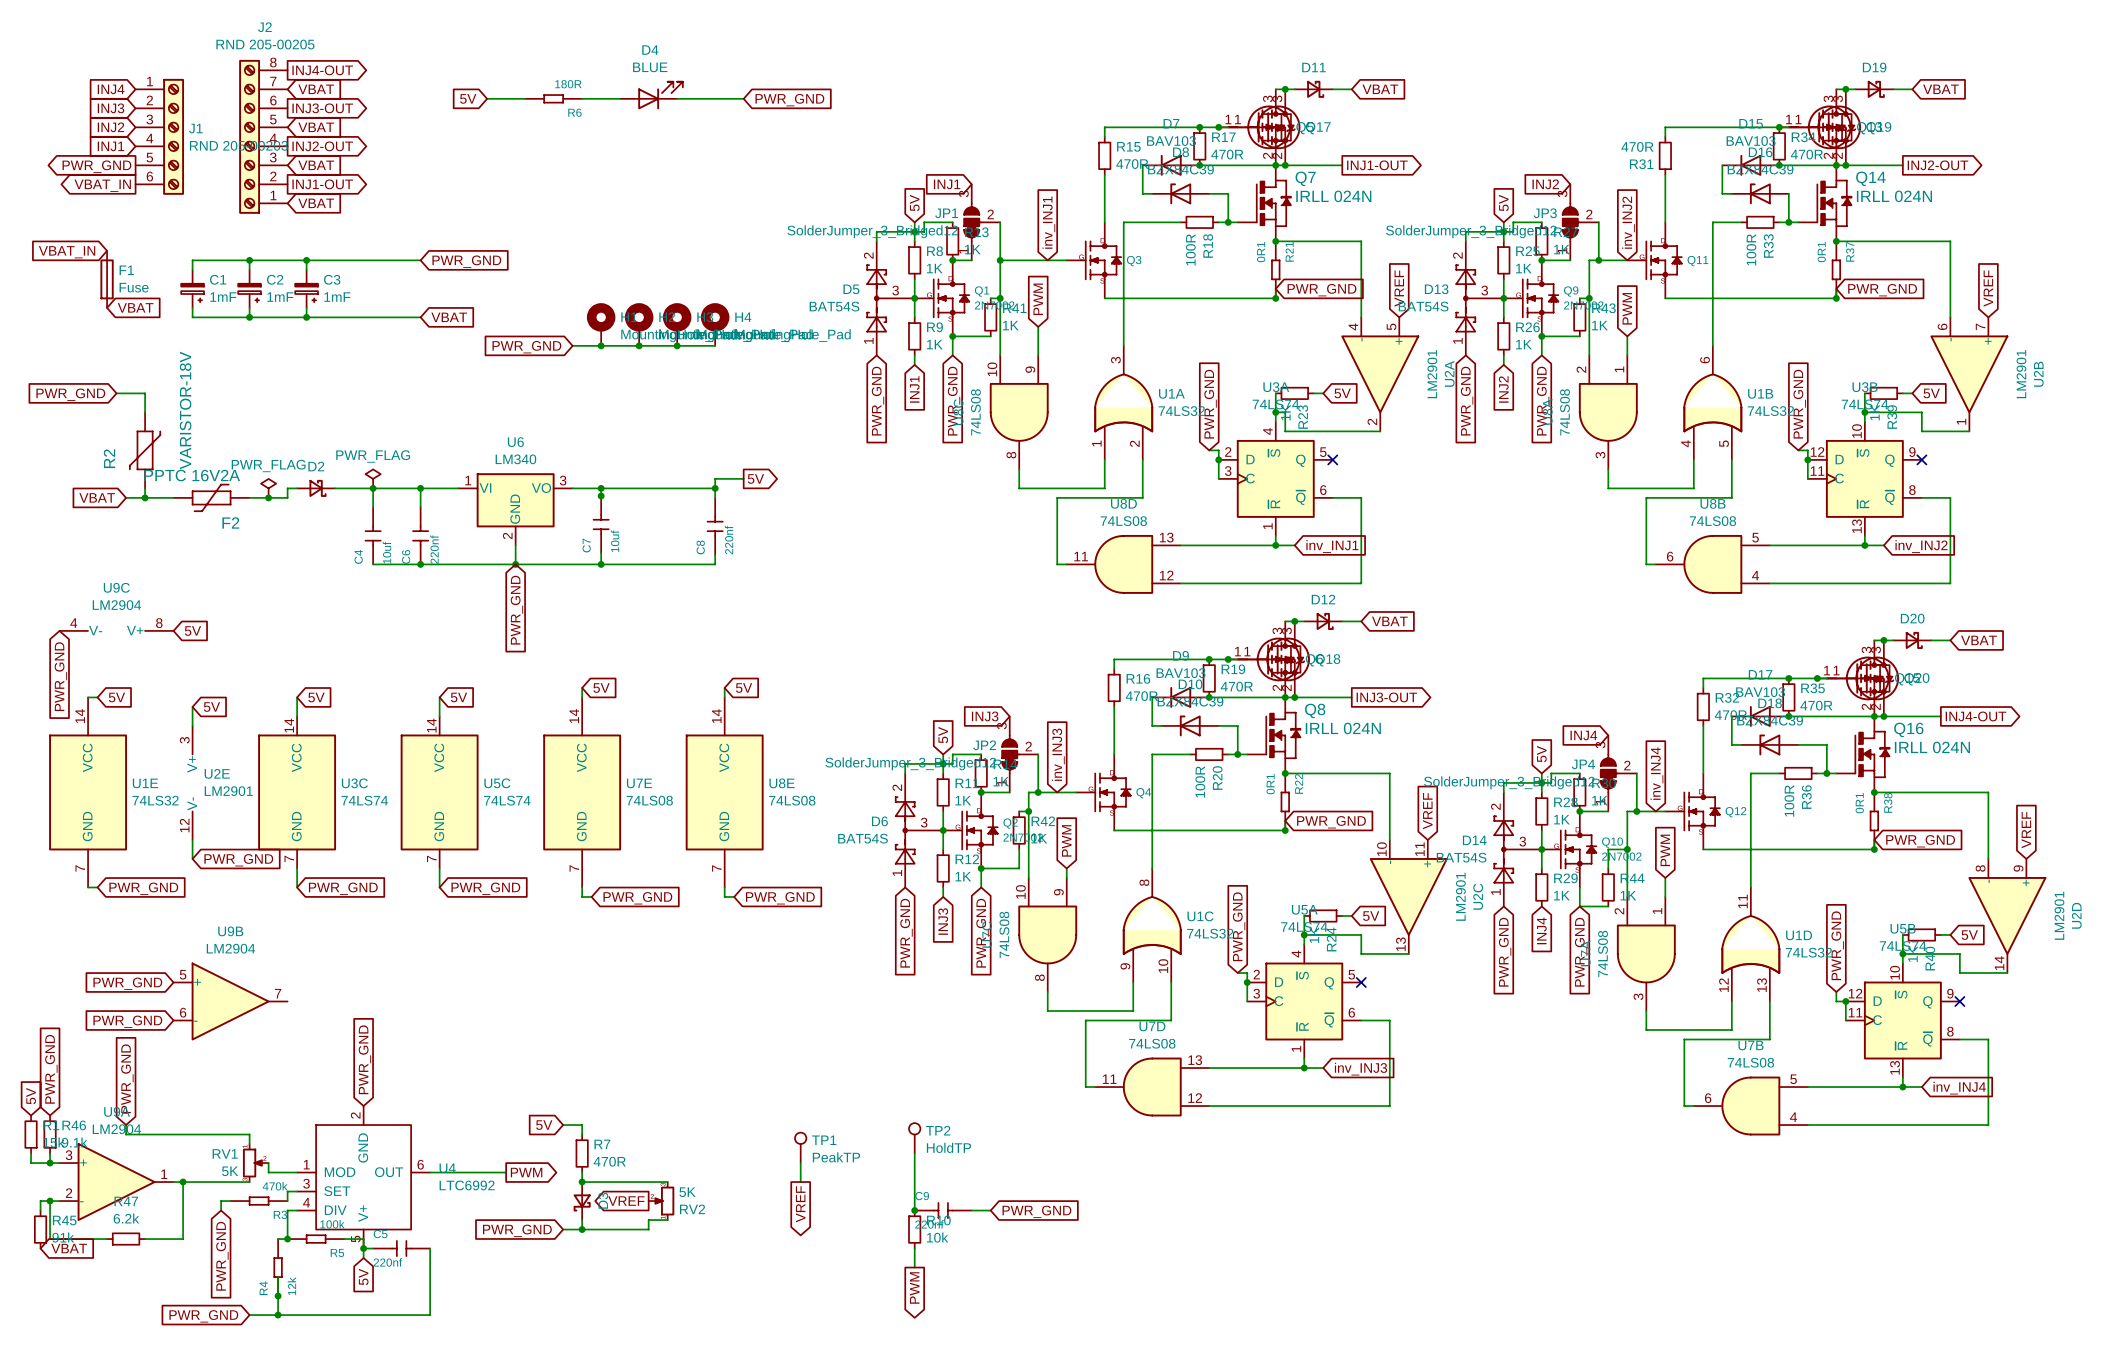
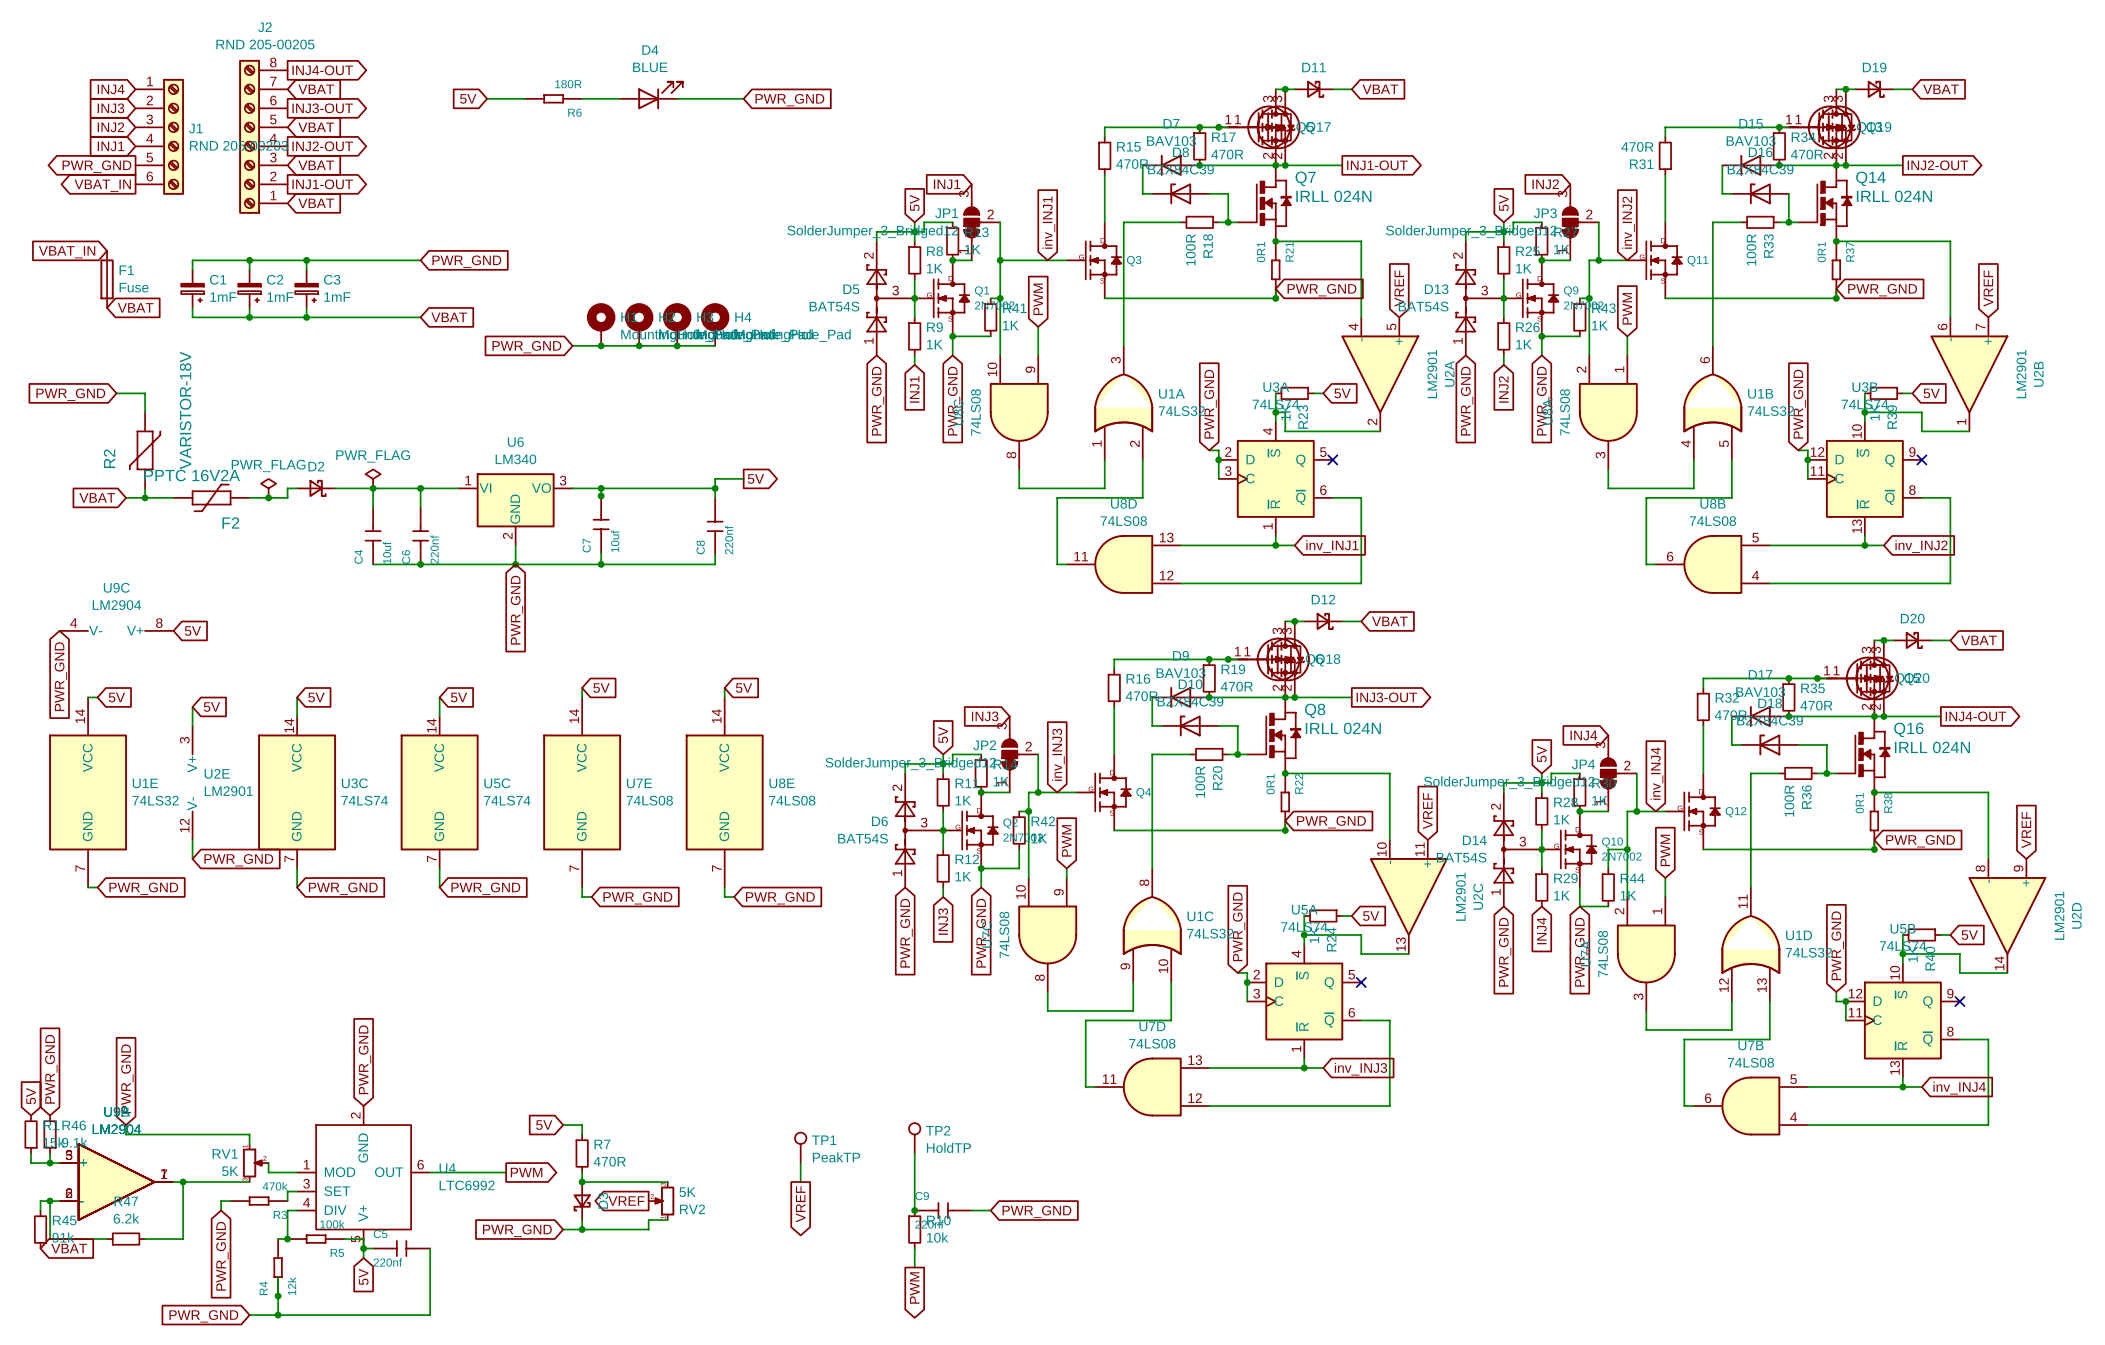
global label: PWR_GND (127, 983) -> none
U9B position: (230, 1001) -> (116, 1182)
global label: PWR_GND (127, 1021) -> none

